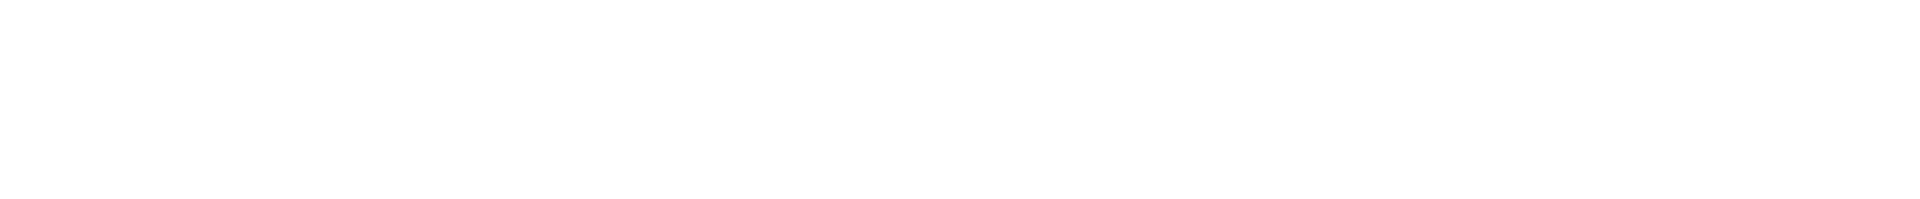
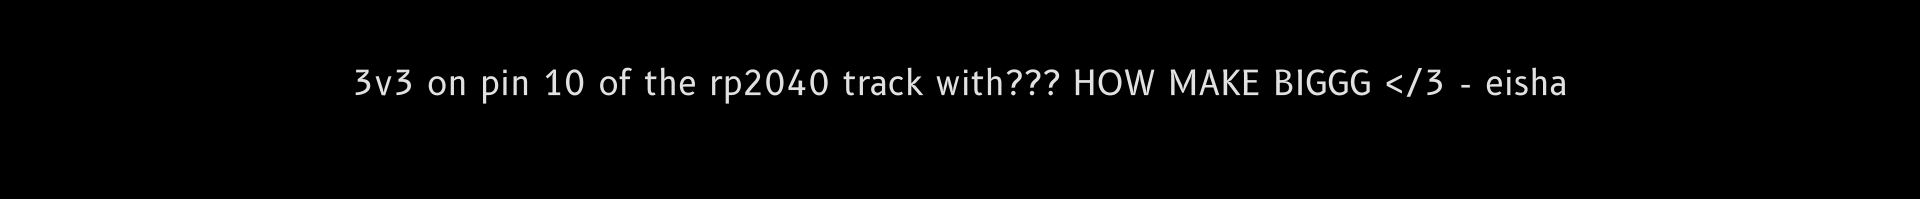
text: none -> 3v3 on pin 10 of the rp2040 track with??? HOW MAKE BIGGG </3 - eisha (960, 85)

